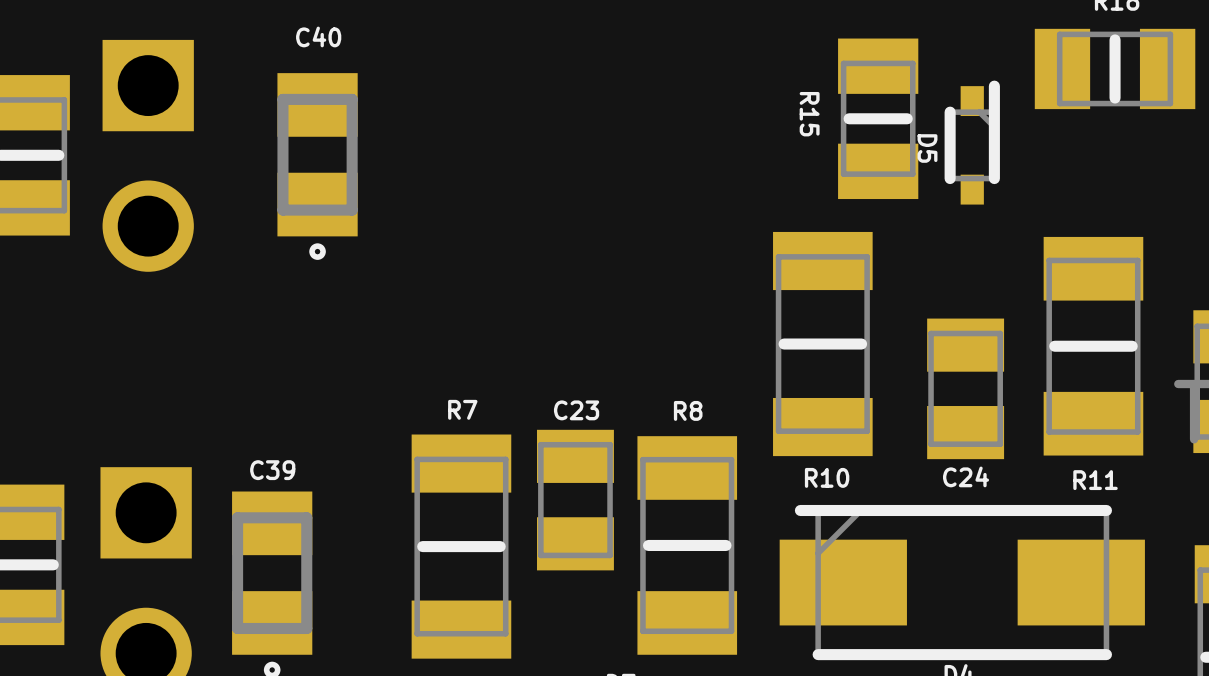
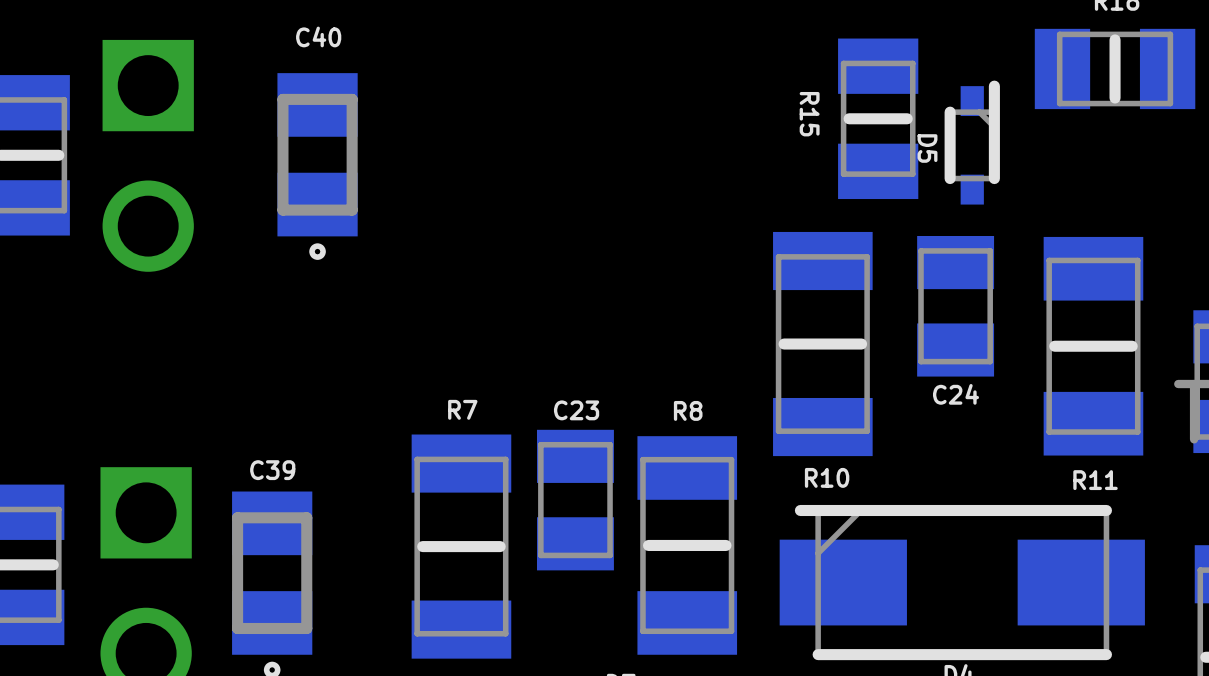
C24 position: (965, 388) -> (955, 306)

